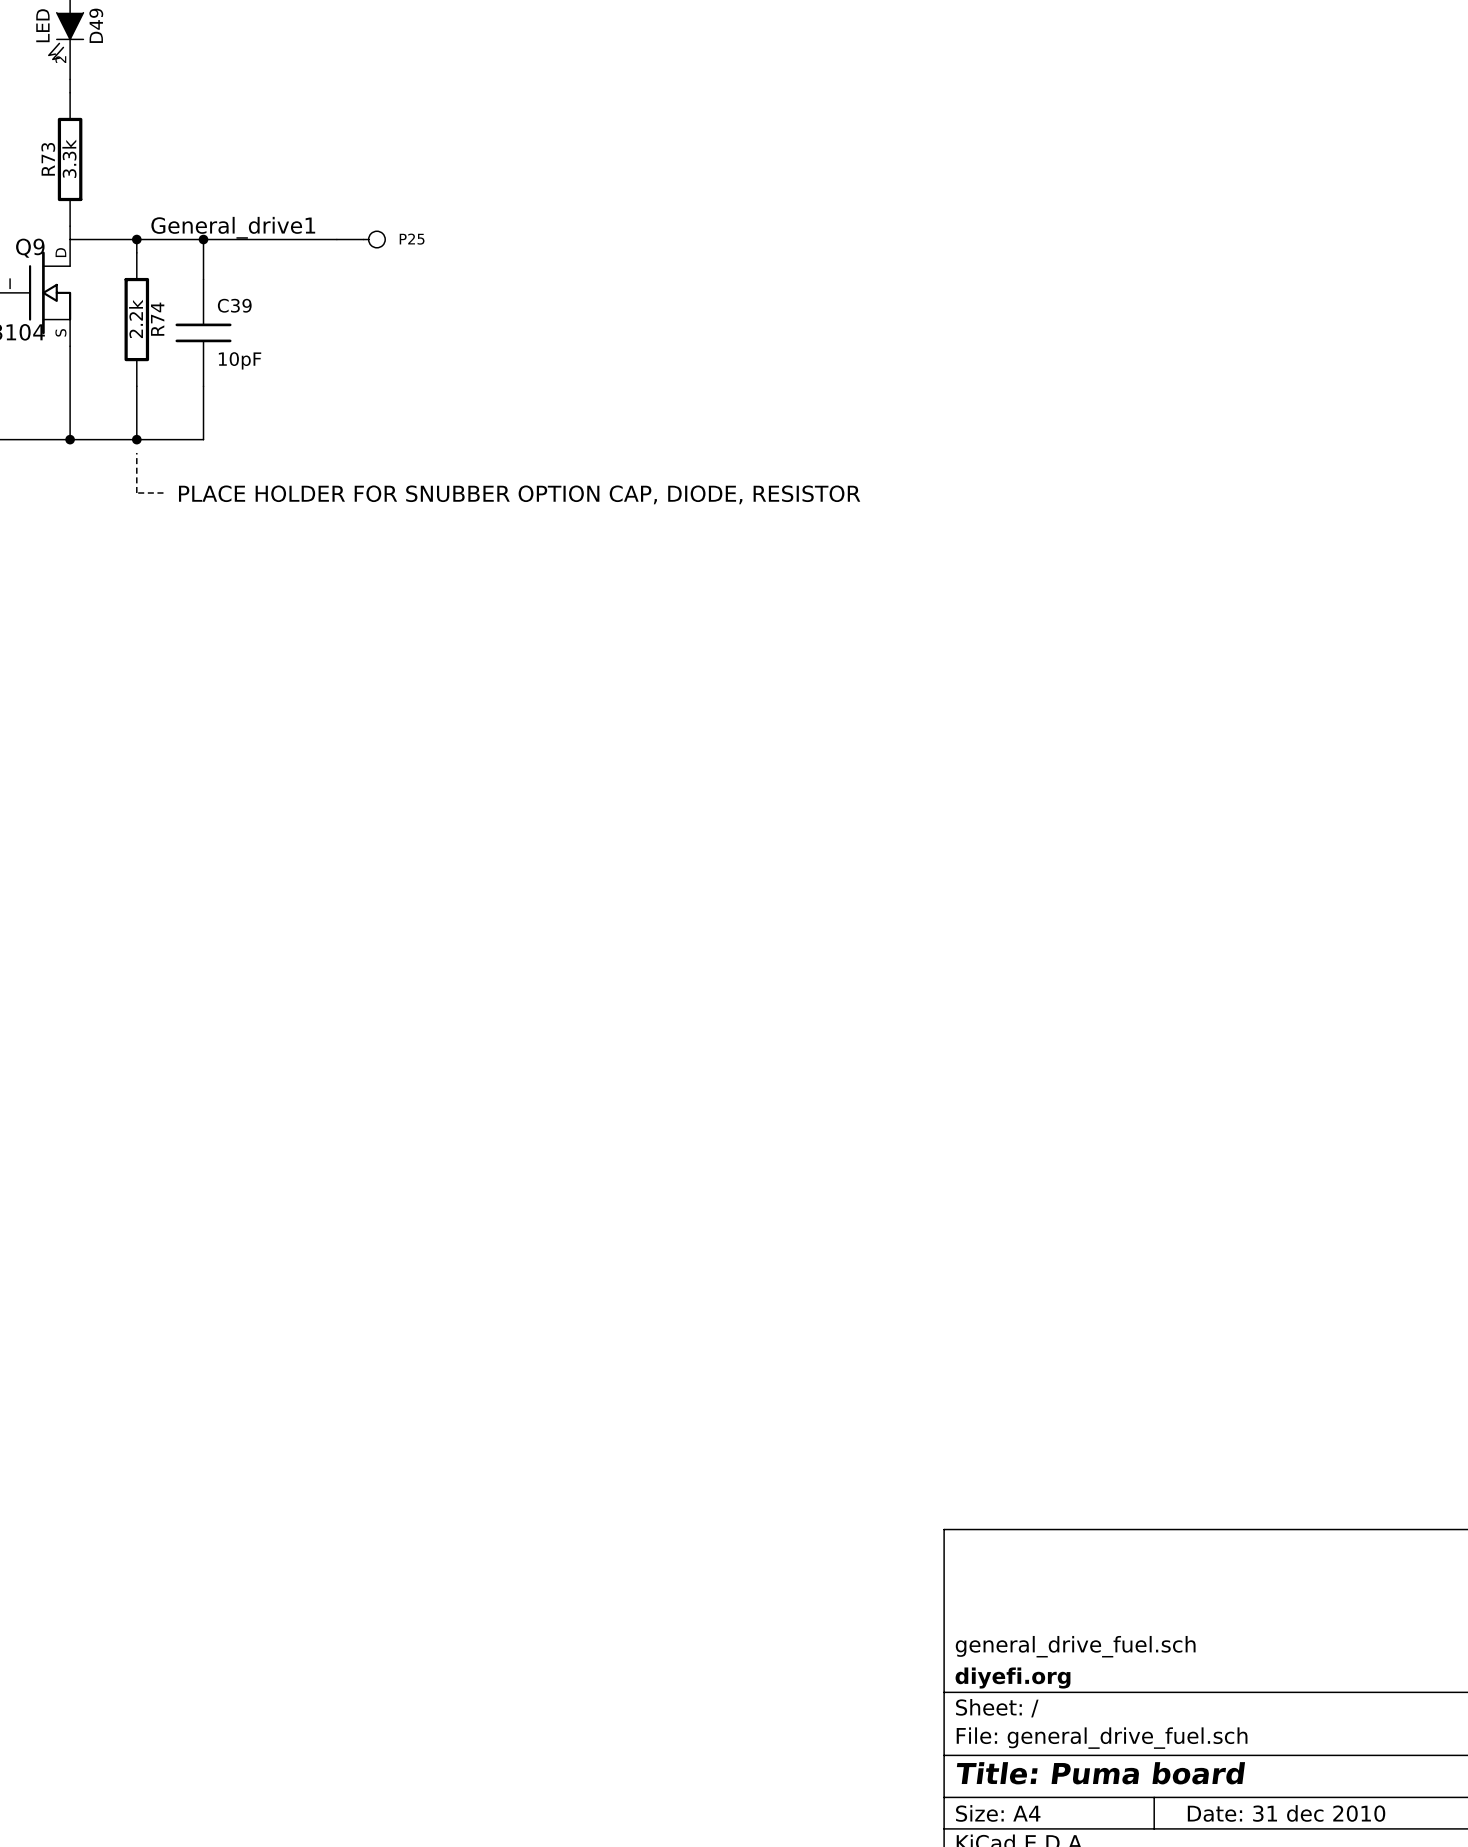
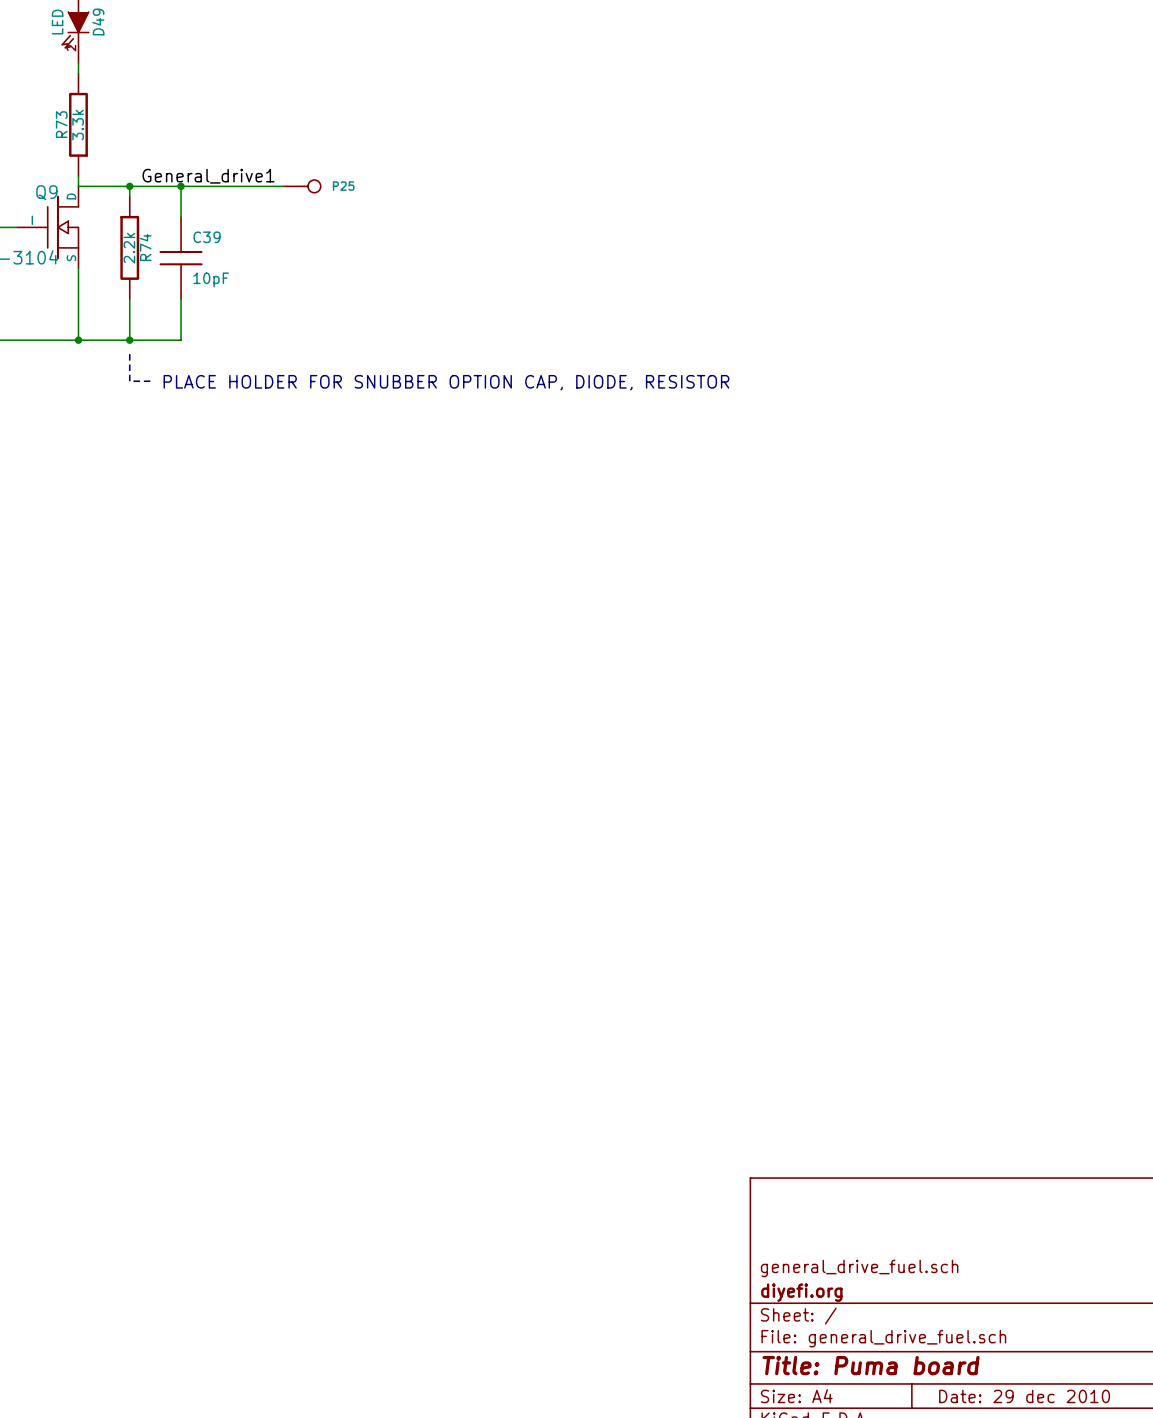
title block: Date: 31 dec 2010 (1286, 1813) -> Date: 29 dec 2010 (1024, 1396)

